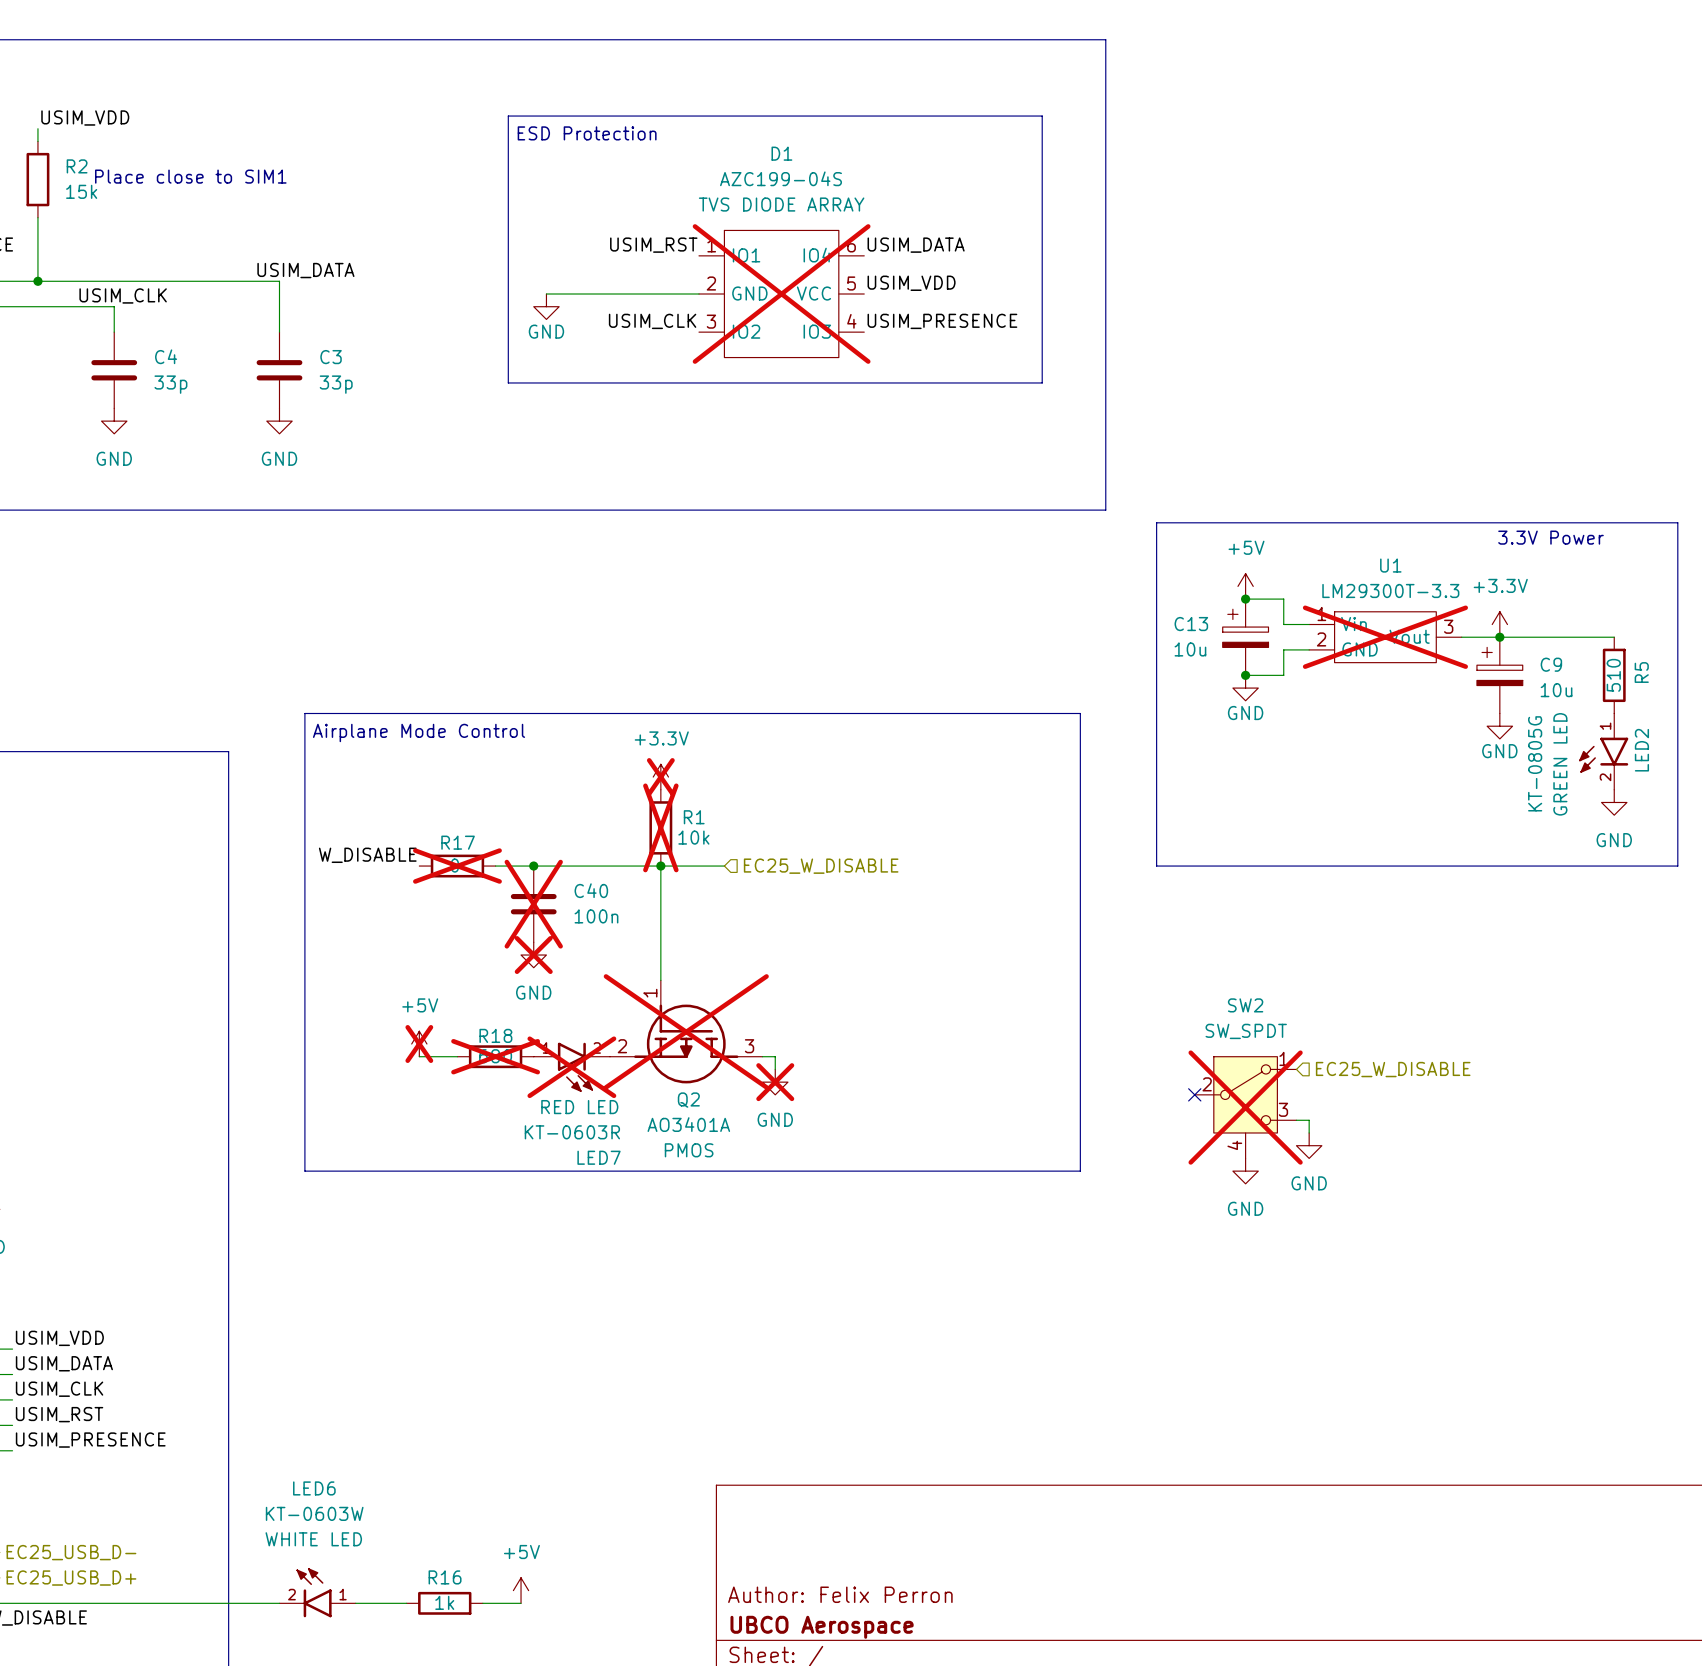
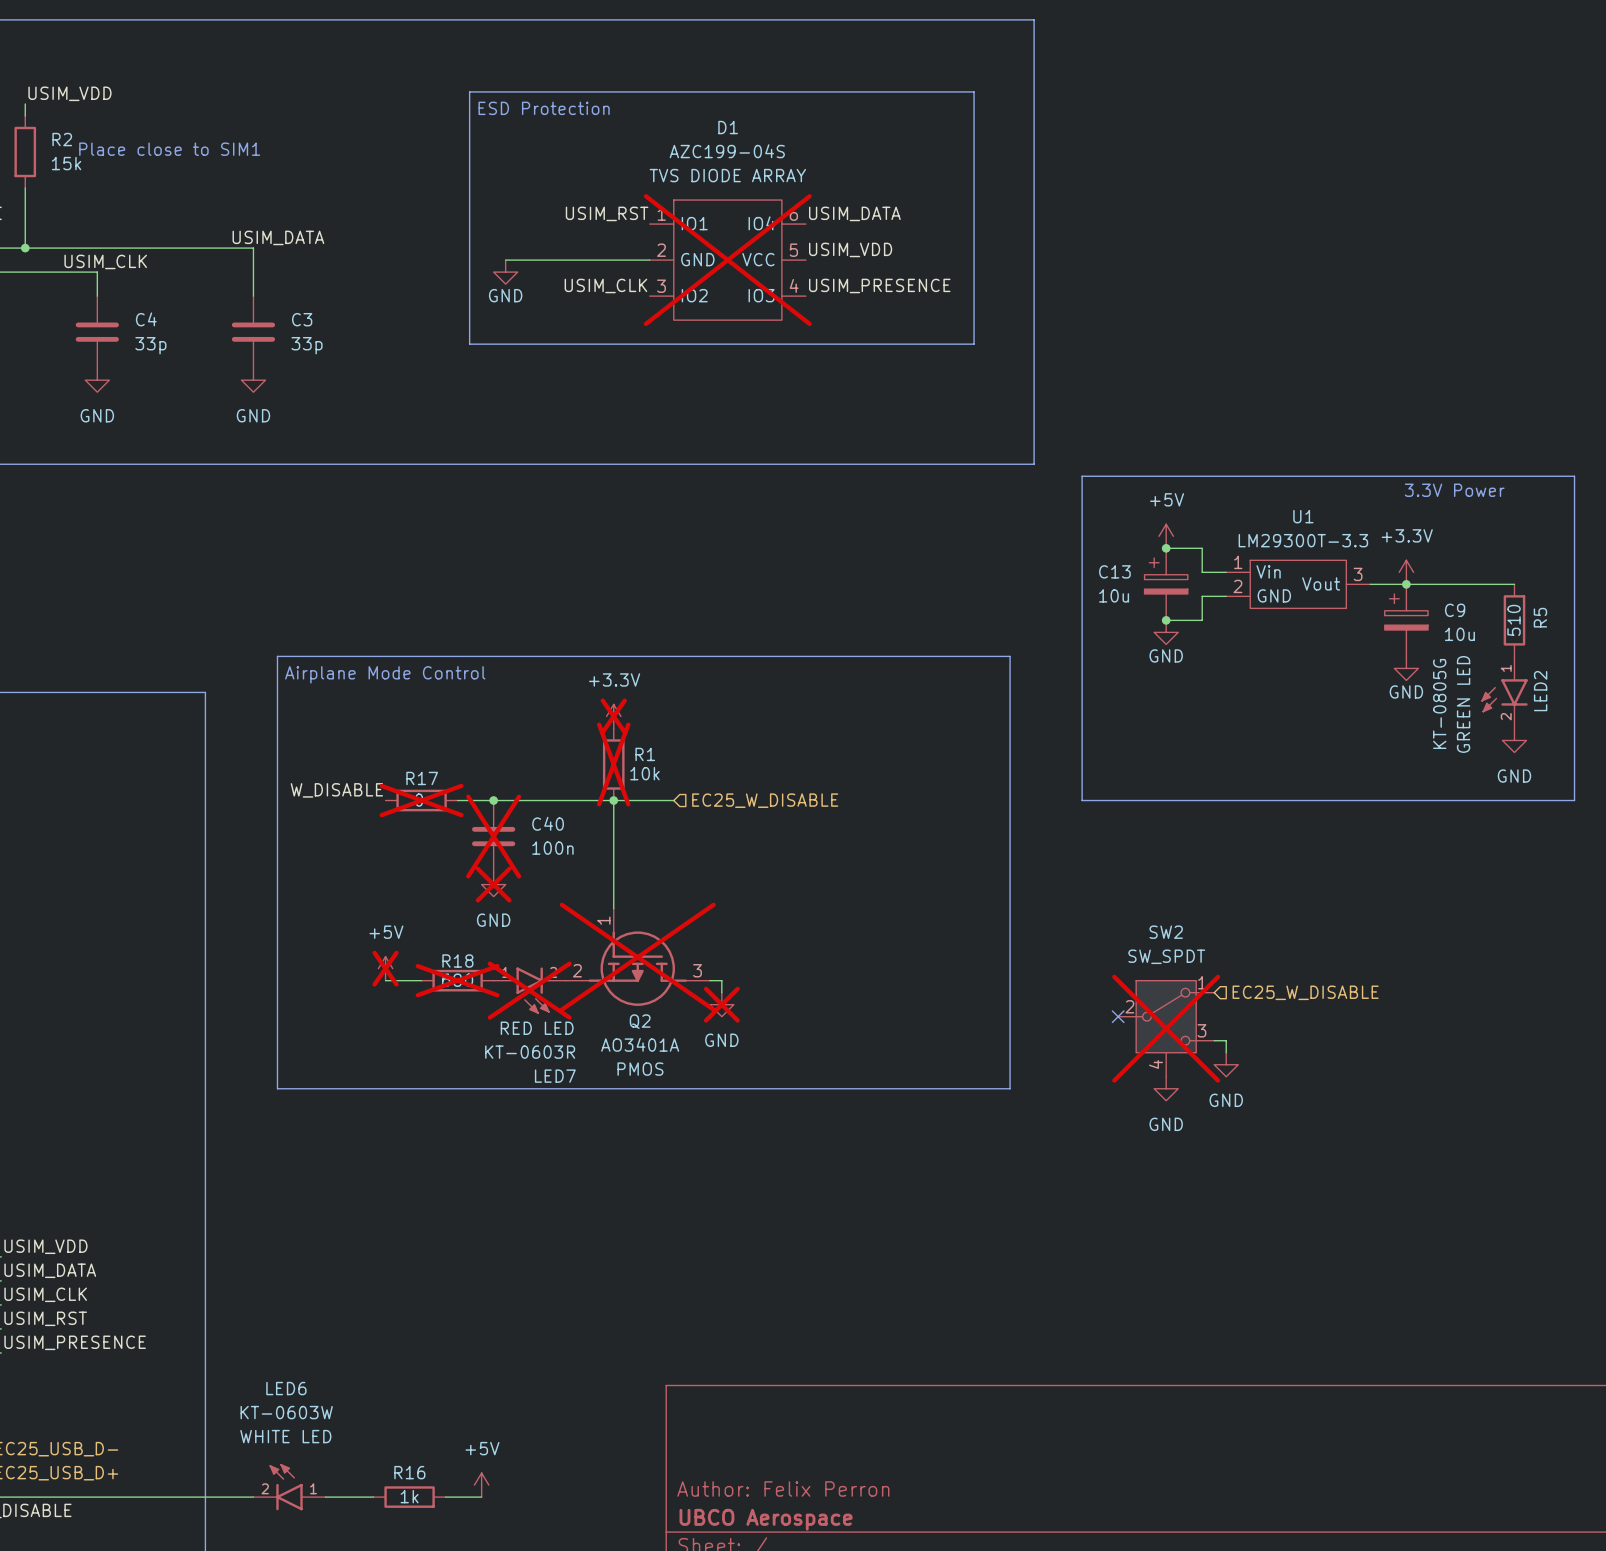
U1 do-not-place cross: (1385, 637) -> none

